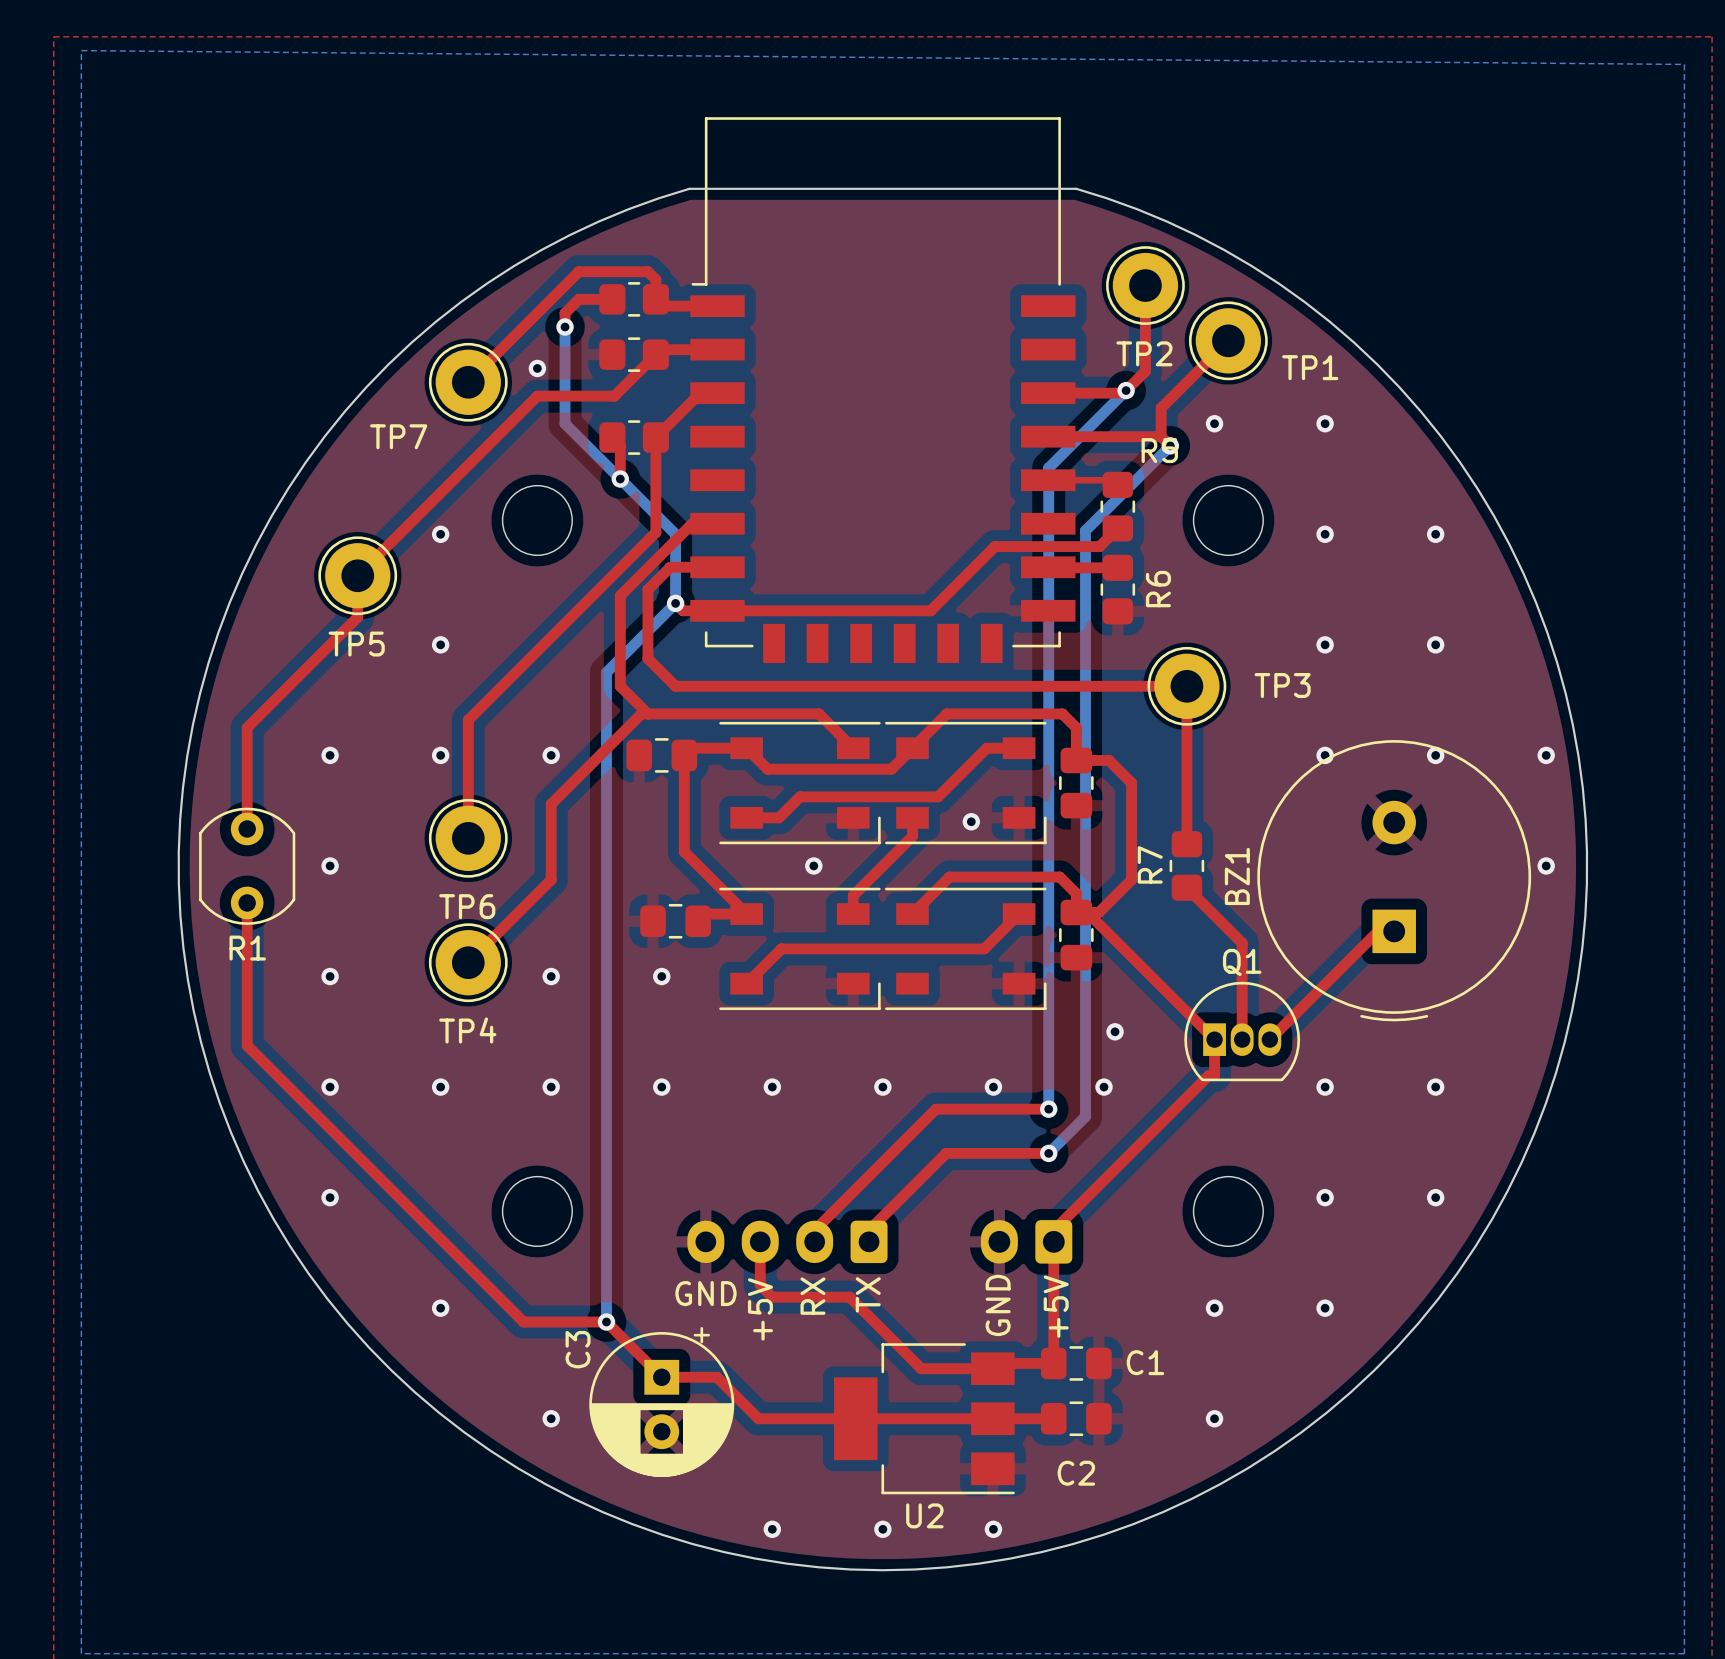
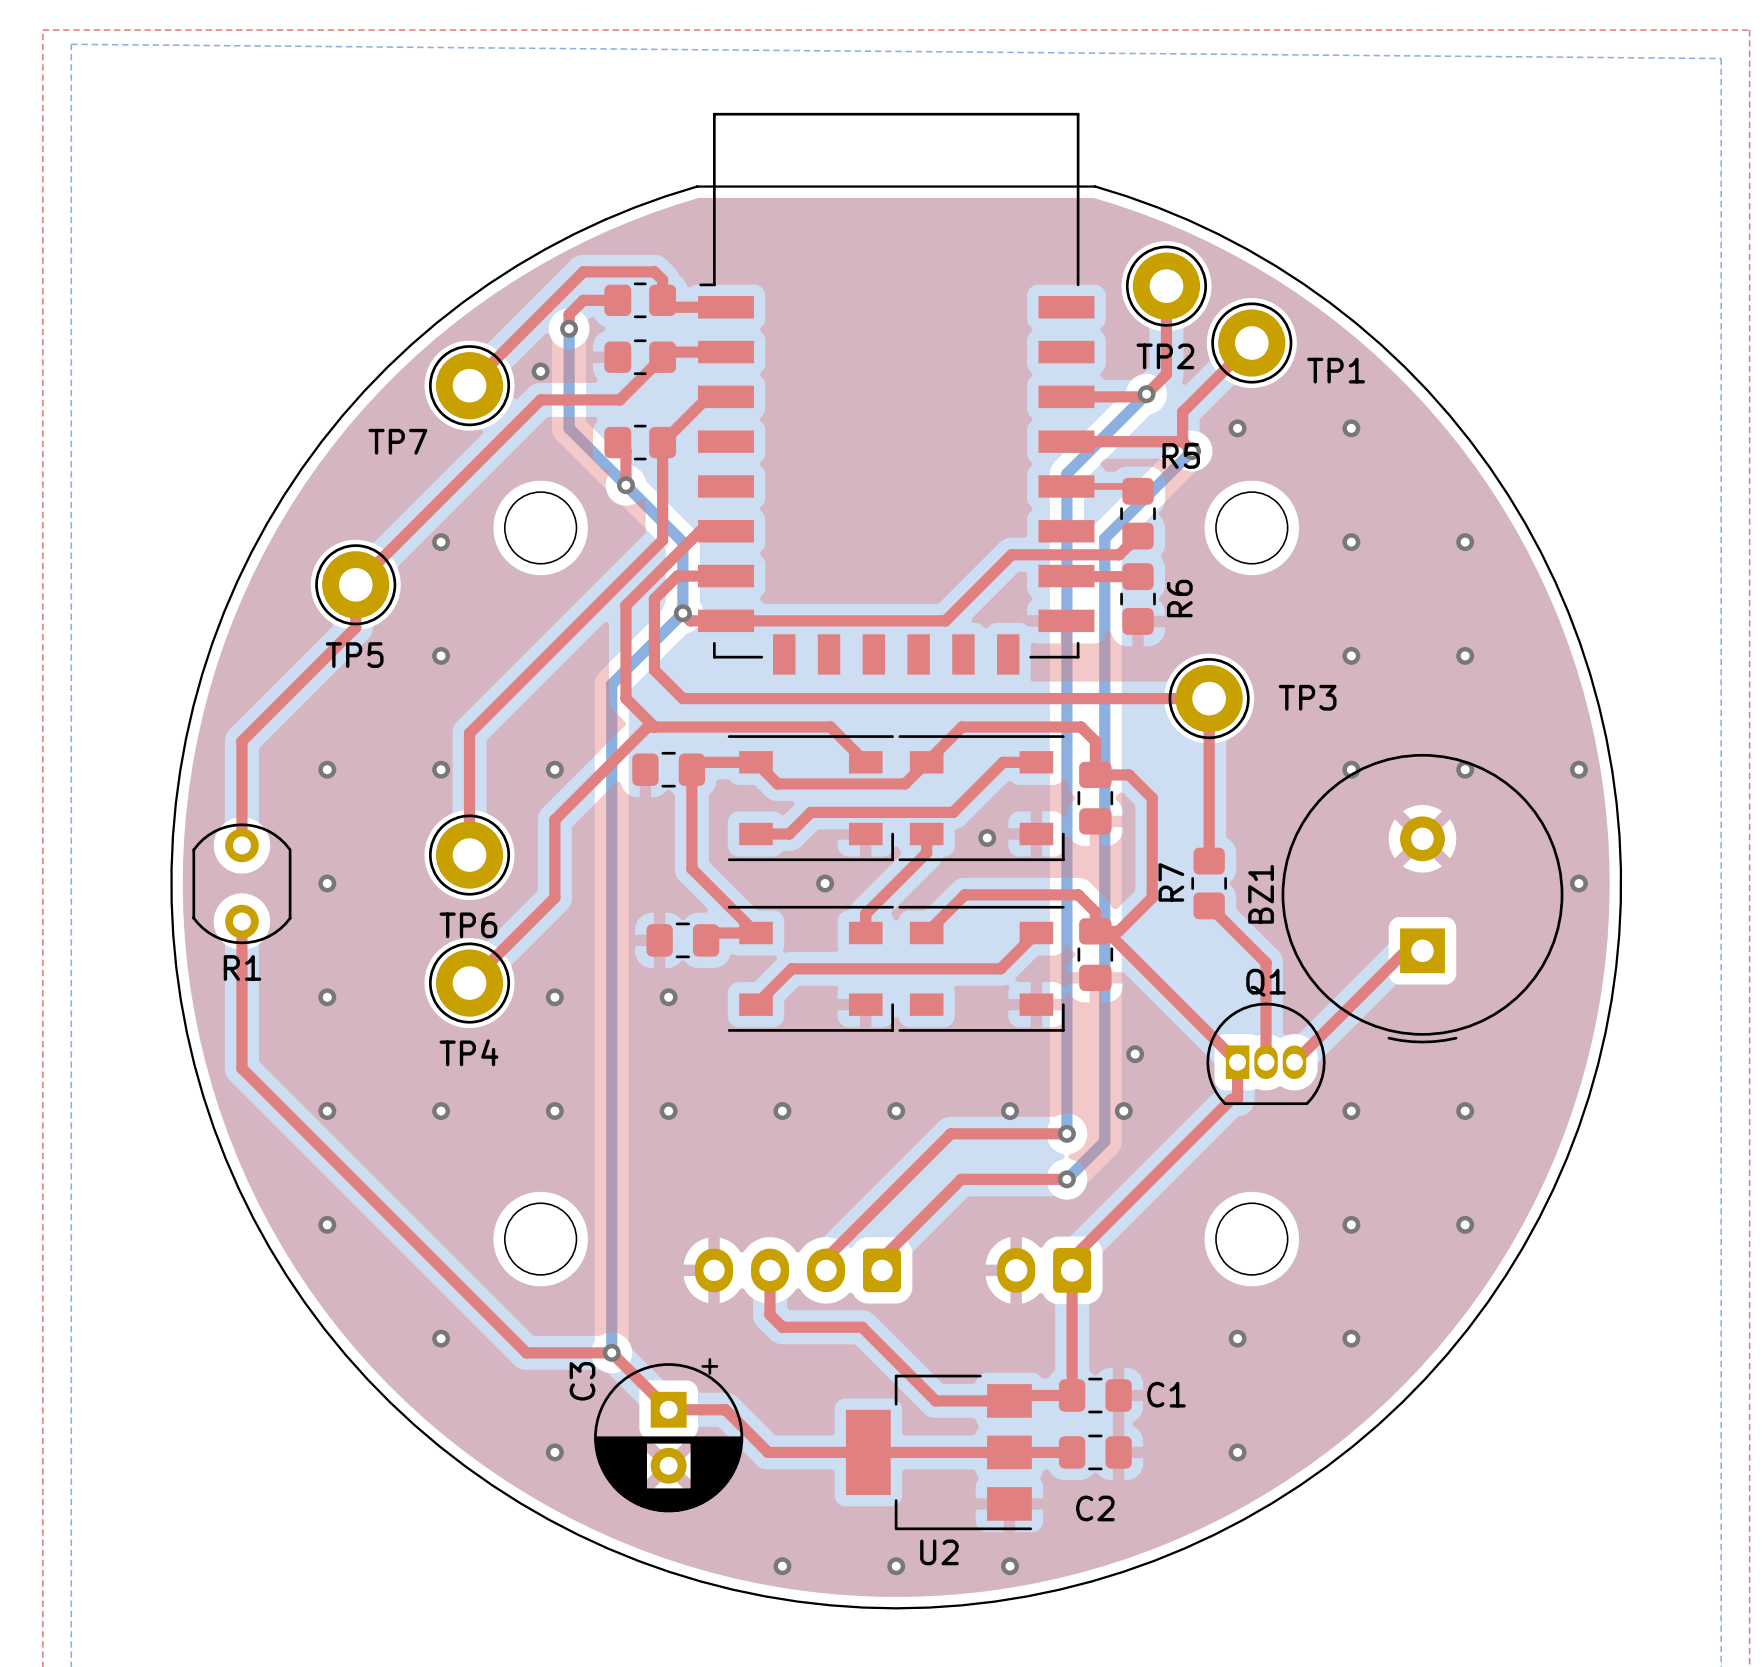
text: GND (705, 1293) -> none
text: TX (868, 1294) -> none
text: RX (812, 1296) -> none
text: GND (998, 1305) -> none
text: +5V (1056, 1306) -> none
text: +5V (760, 1309) -> none

